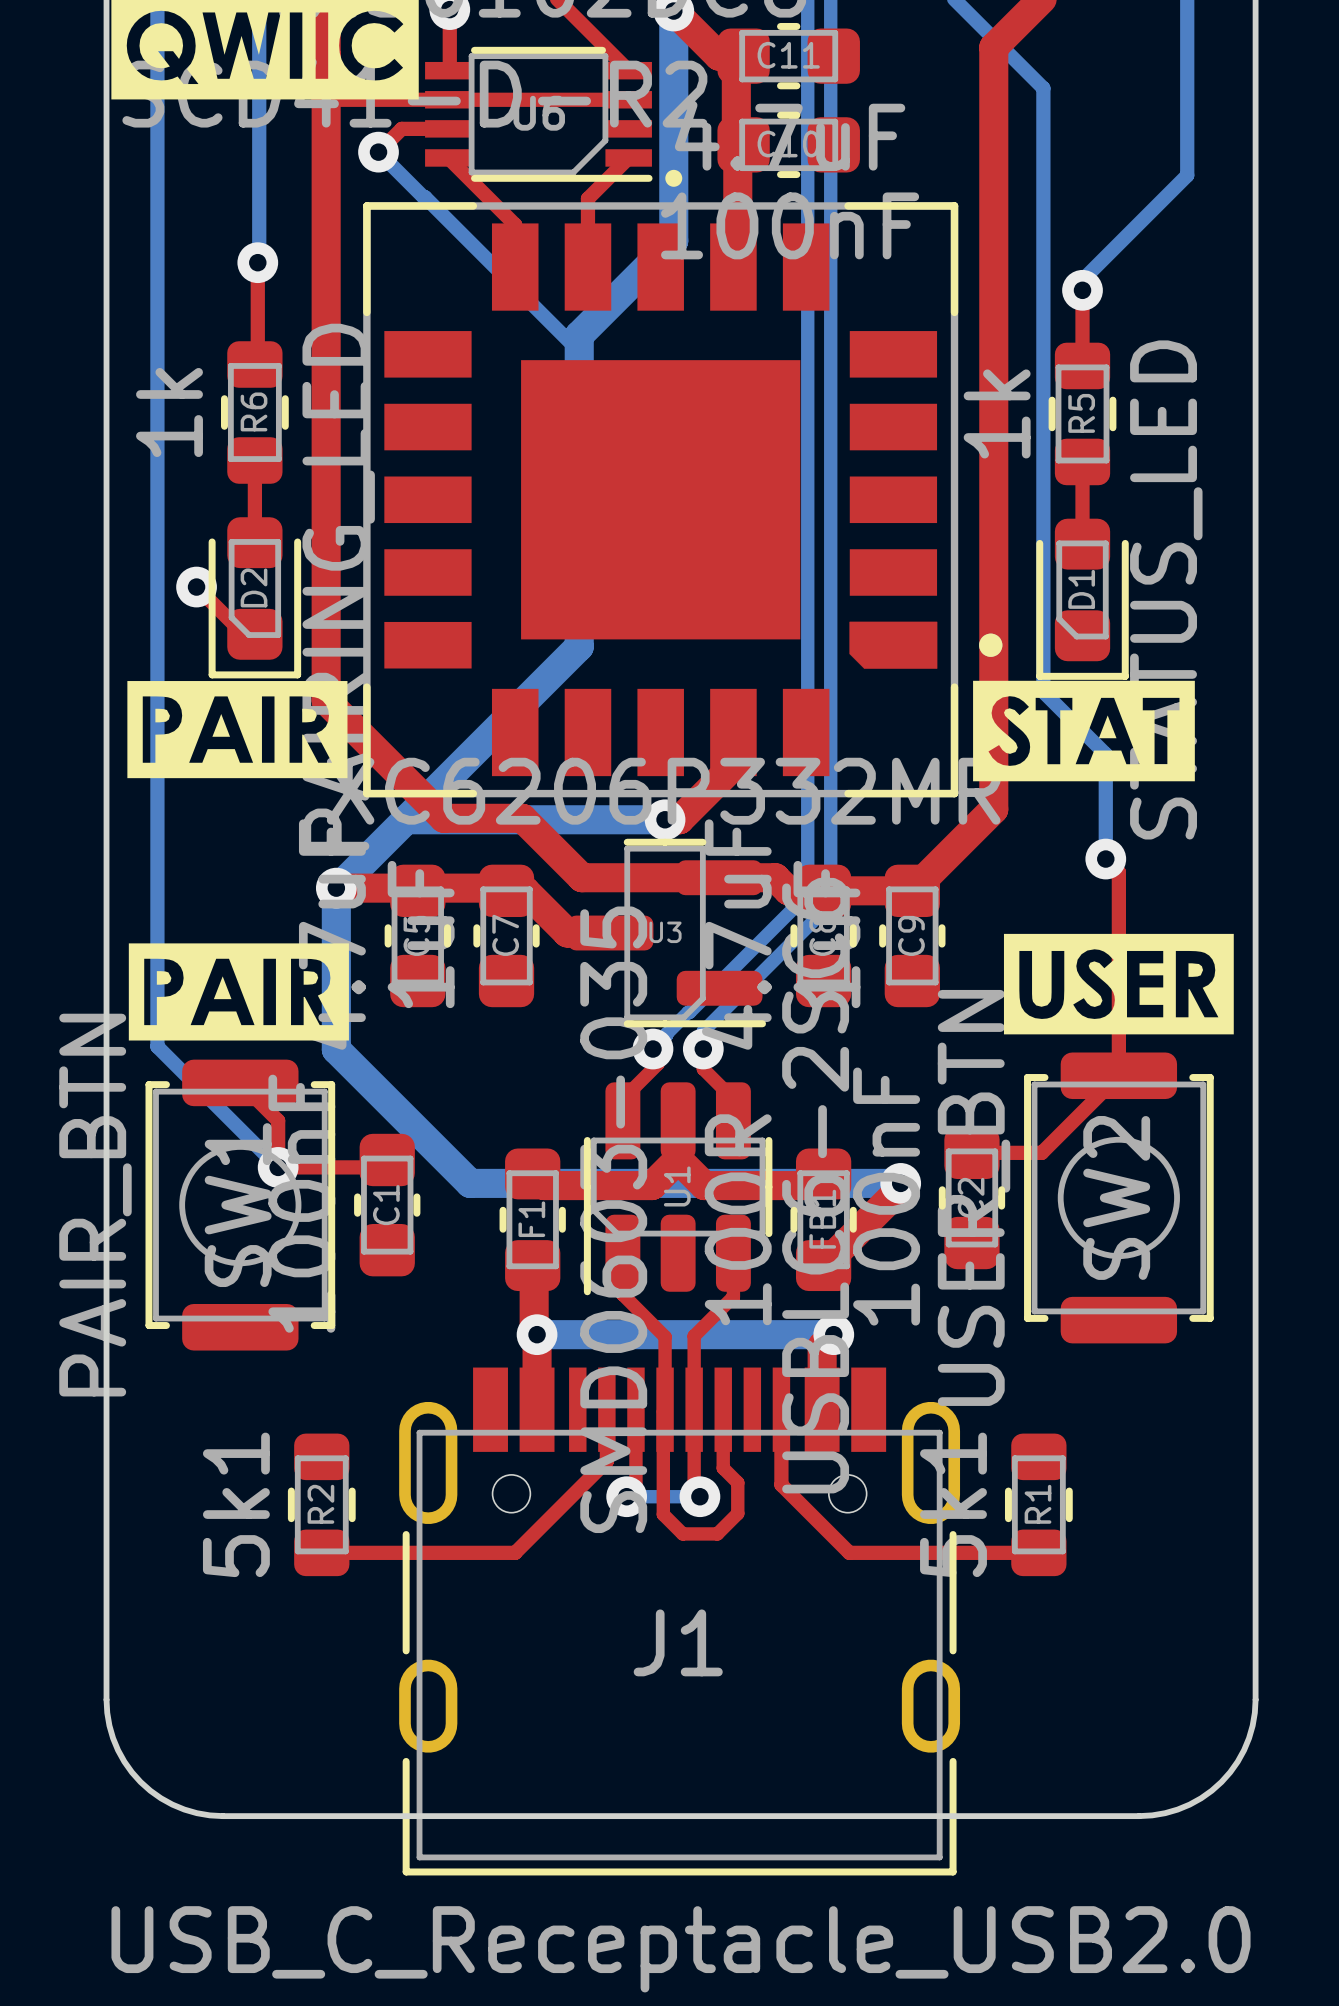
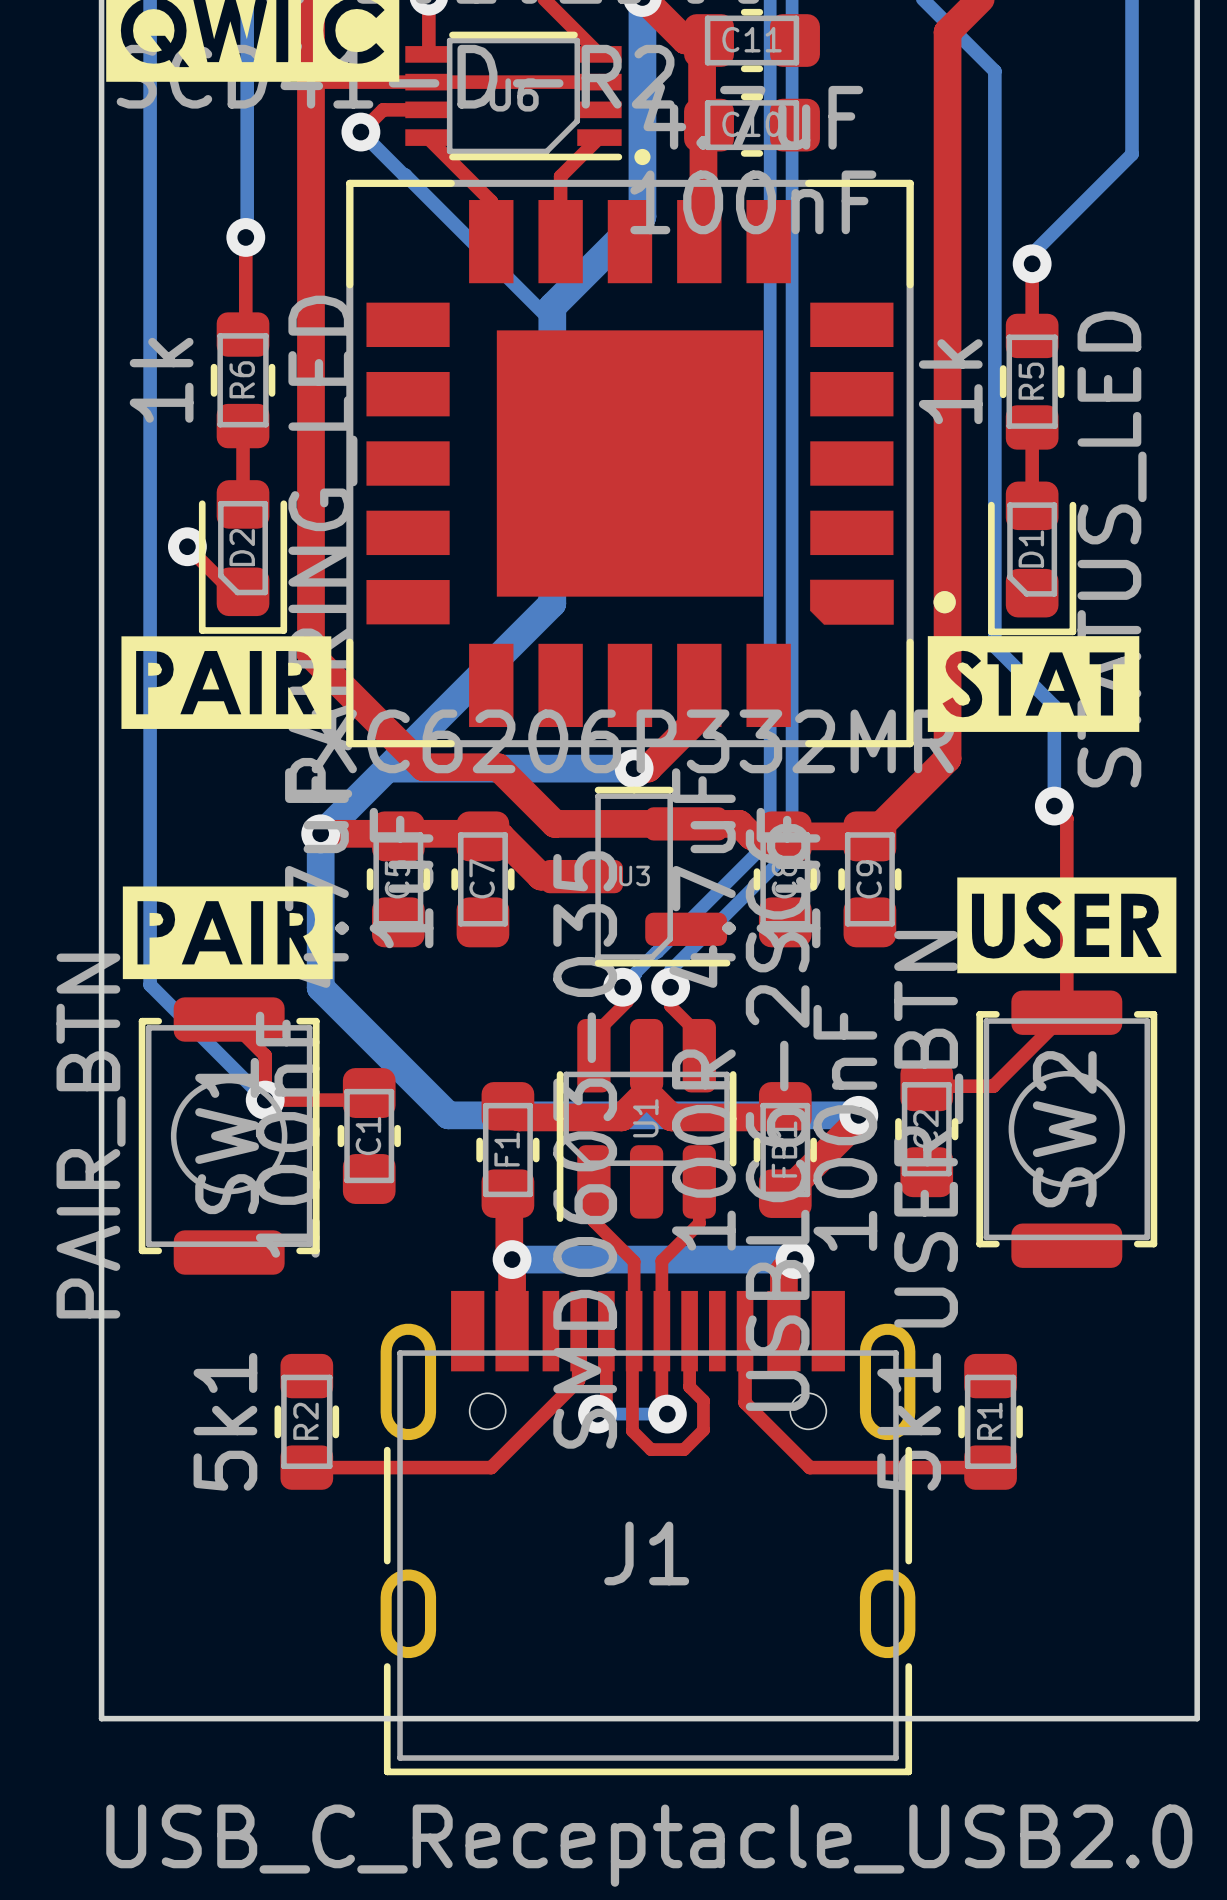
board edge: (106, 1699) (109, 1725) (118, 1750) (140, 1782) (160, 1798) (184, 1809) (222, 1816) -> (101, 1607) (101, 1718) (212, 1718)
board edge: (1255, 1699) (1249, 1738) (1237, 1761) (1221, 1782) (1201, 1798) (1177, 1809) (1139, 1816) -> (1197, 1607) (1197, 1718) (1086, 1718)

